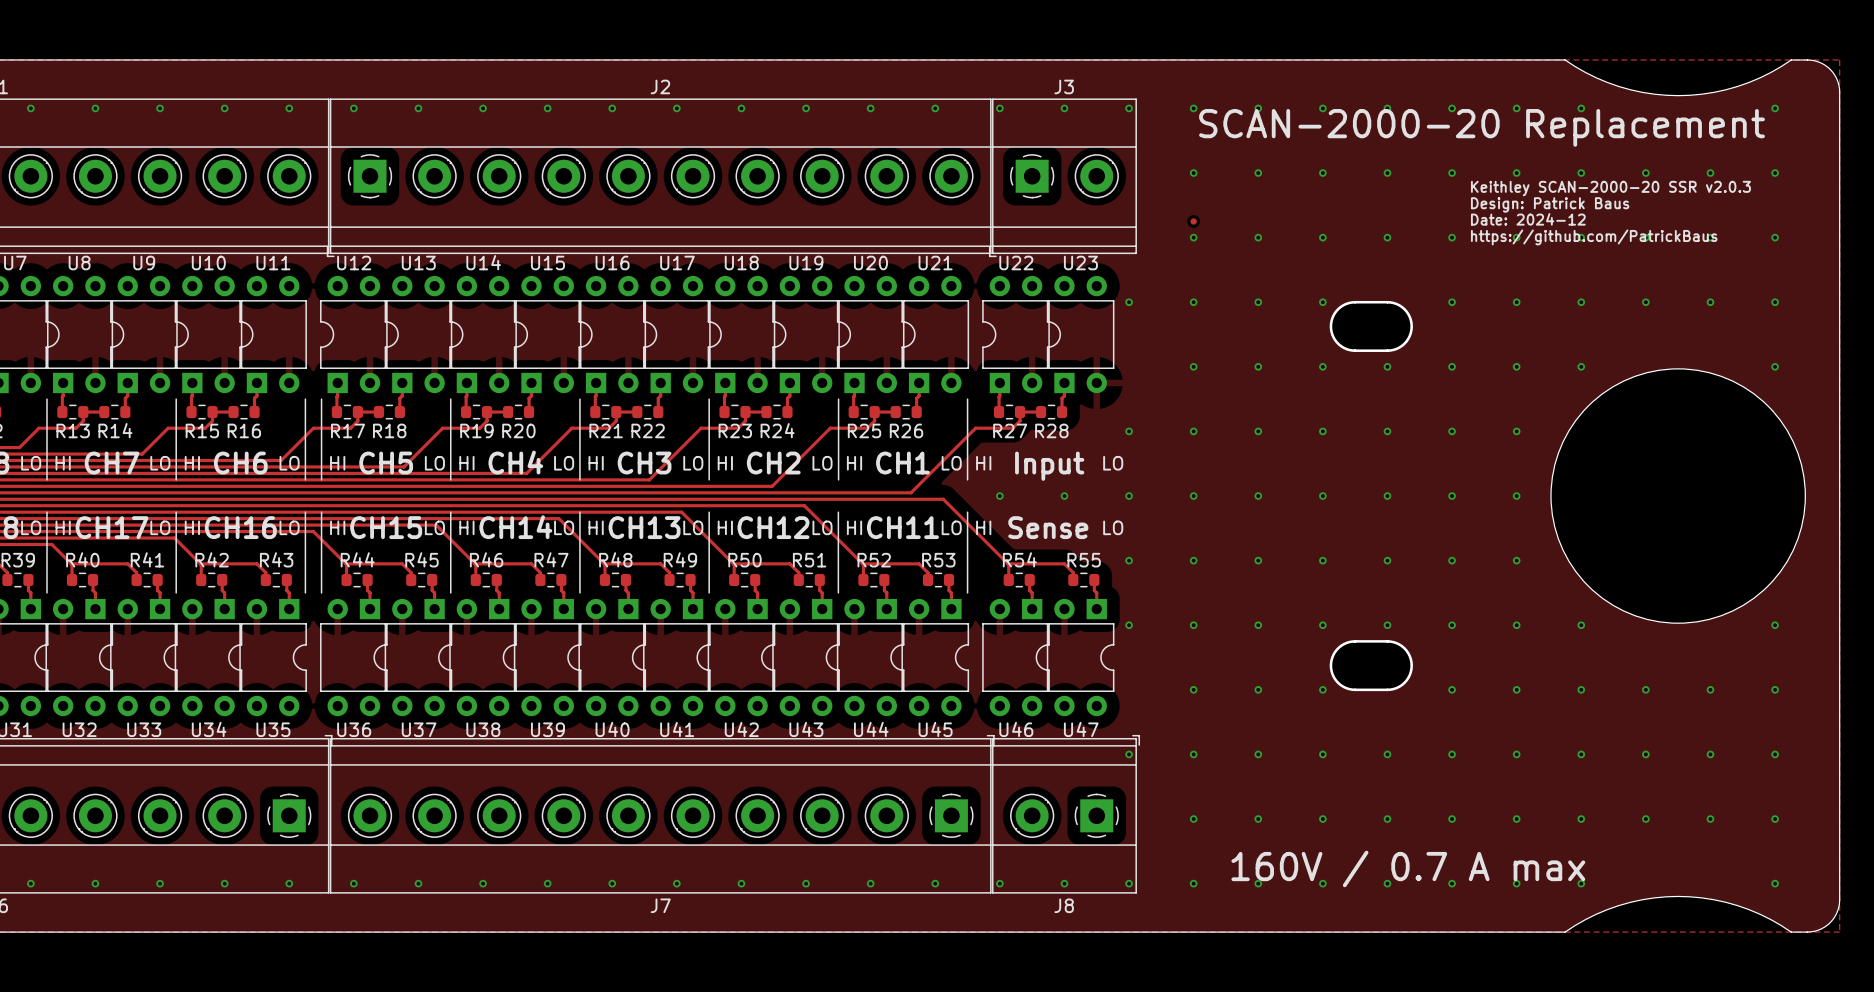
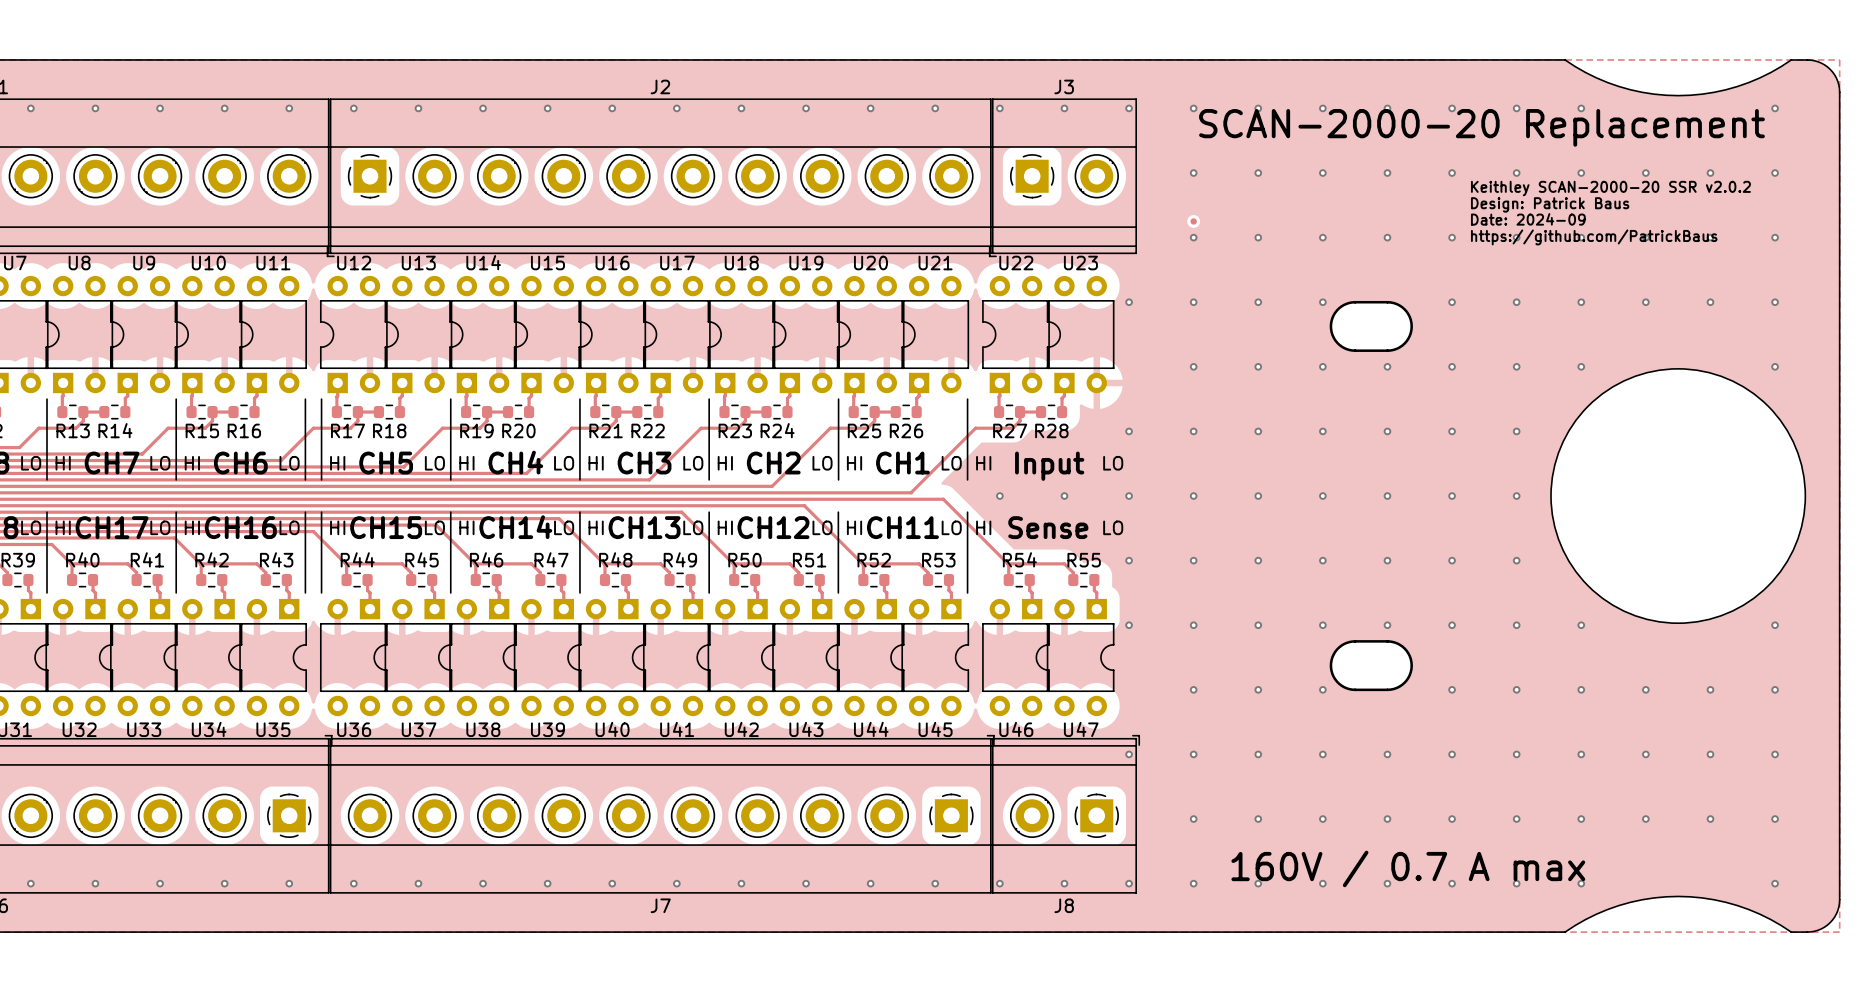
text: Keithley SCAN-2000-20 SSR v2.0.3 (1610, 188) -> Keithley SCAN-2000-20 SSR v2.0.2 (1610, 188)
text: Date: 2024-12 (1528, 219) -> Date: 2024-09 (1528, 219)

